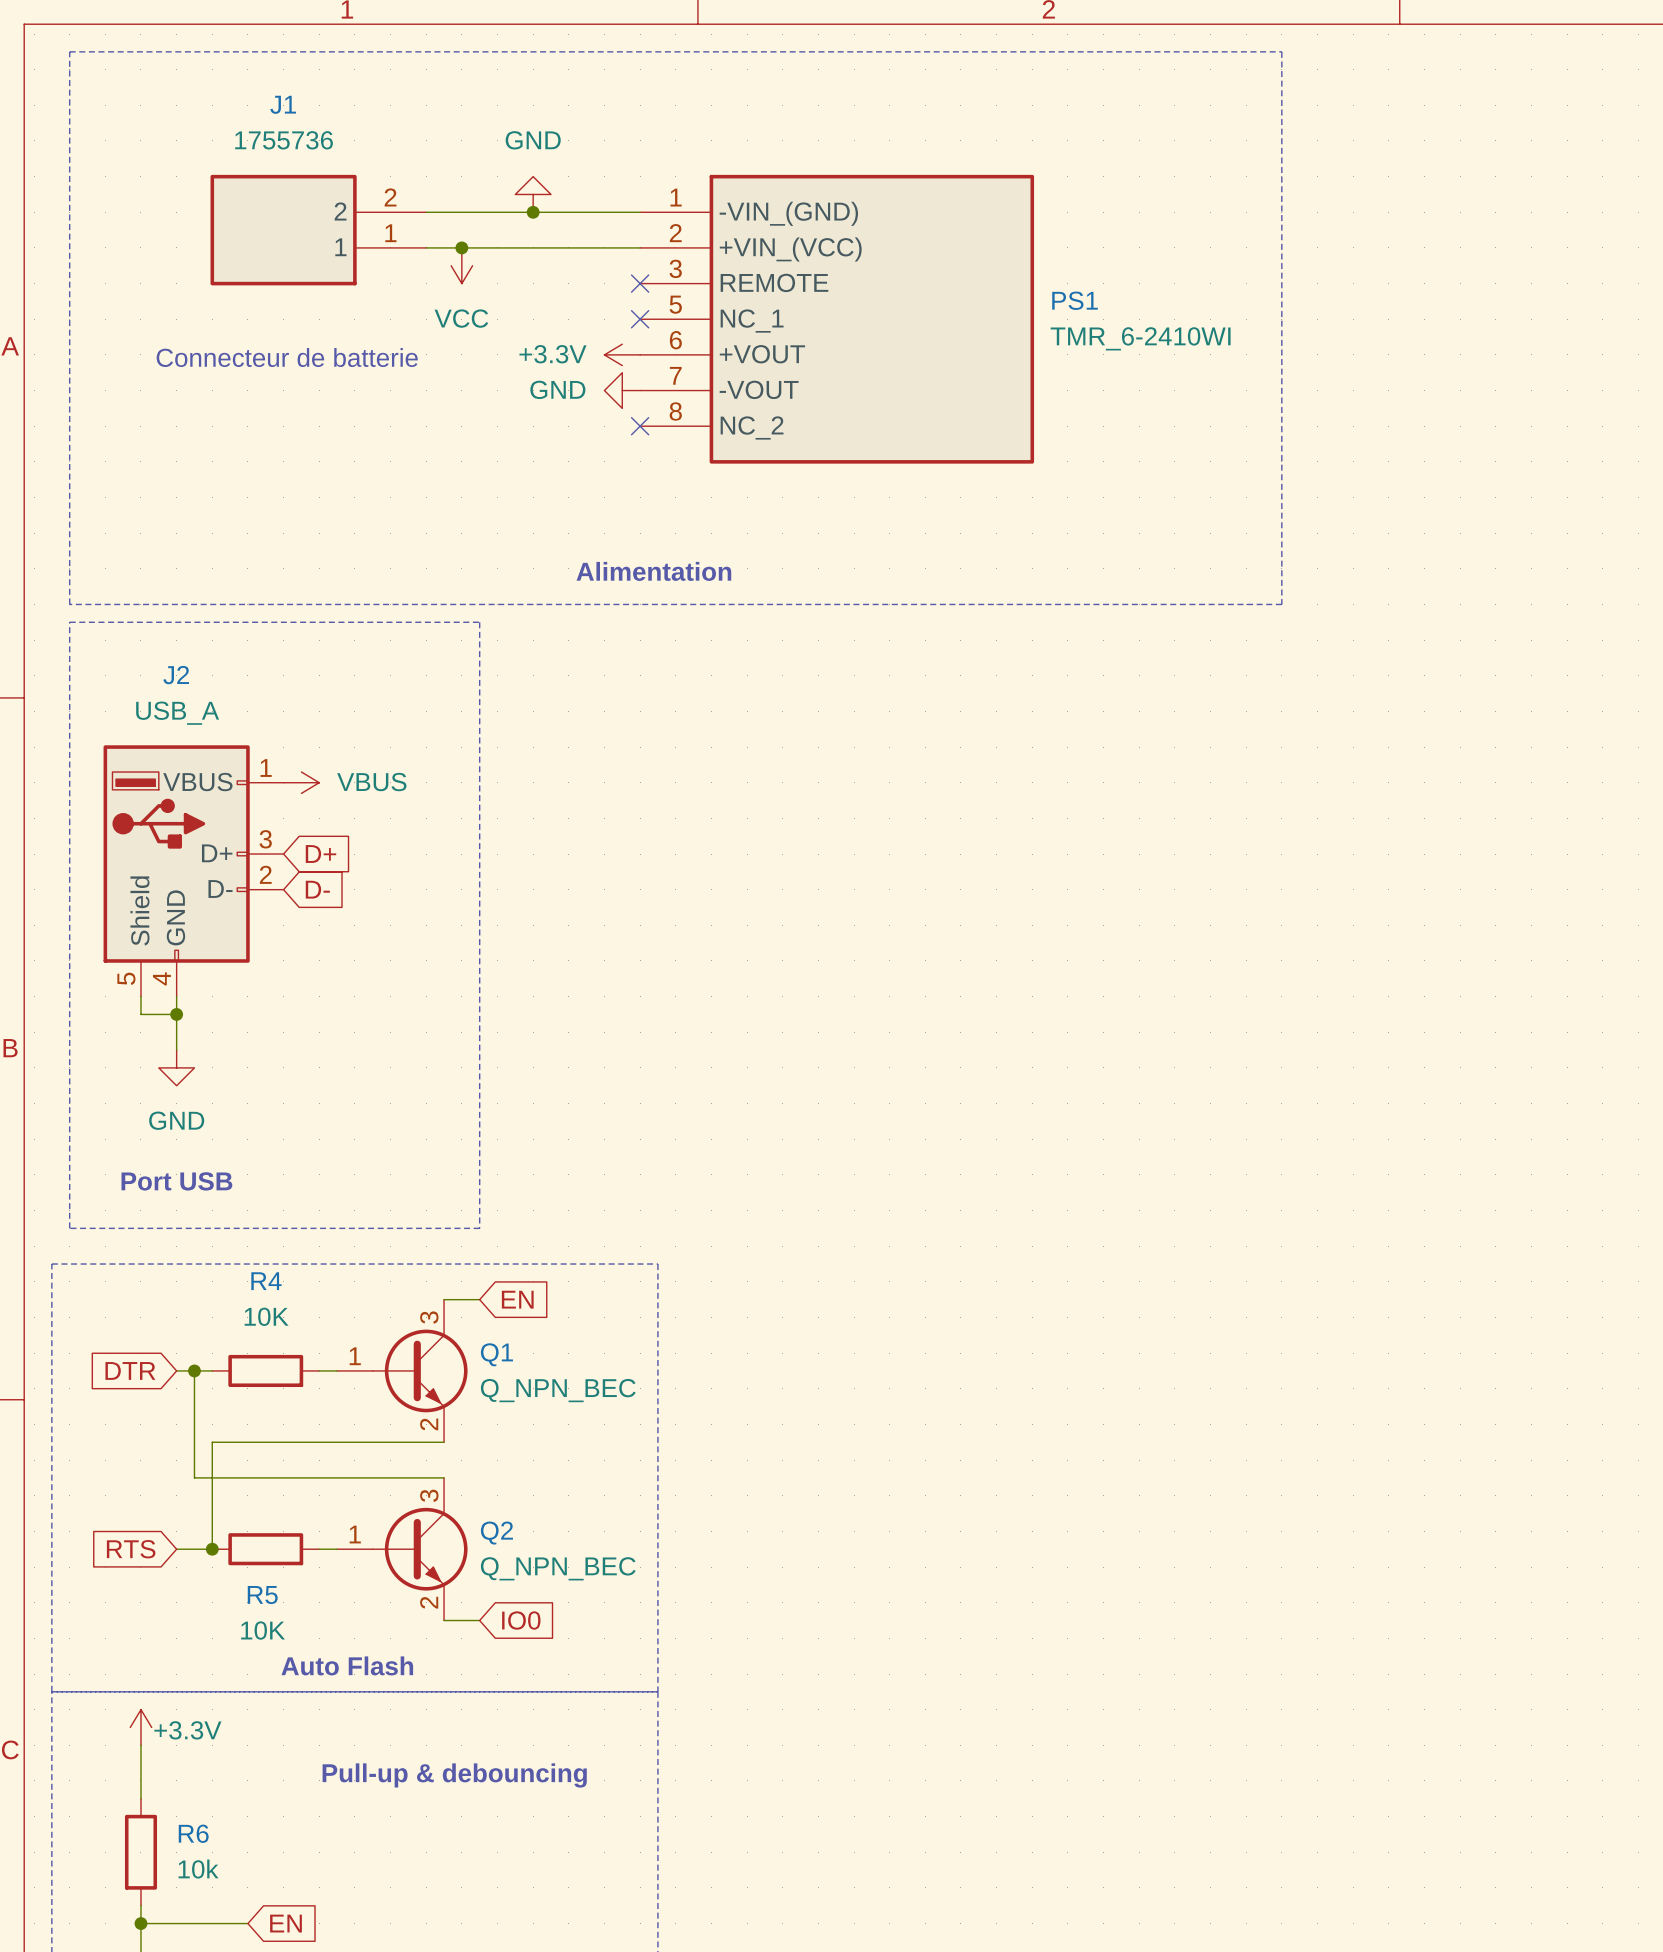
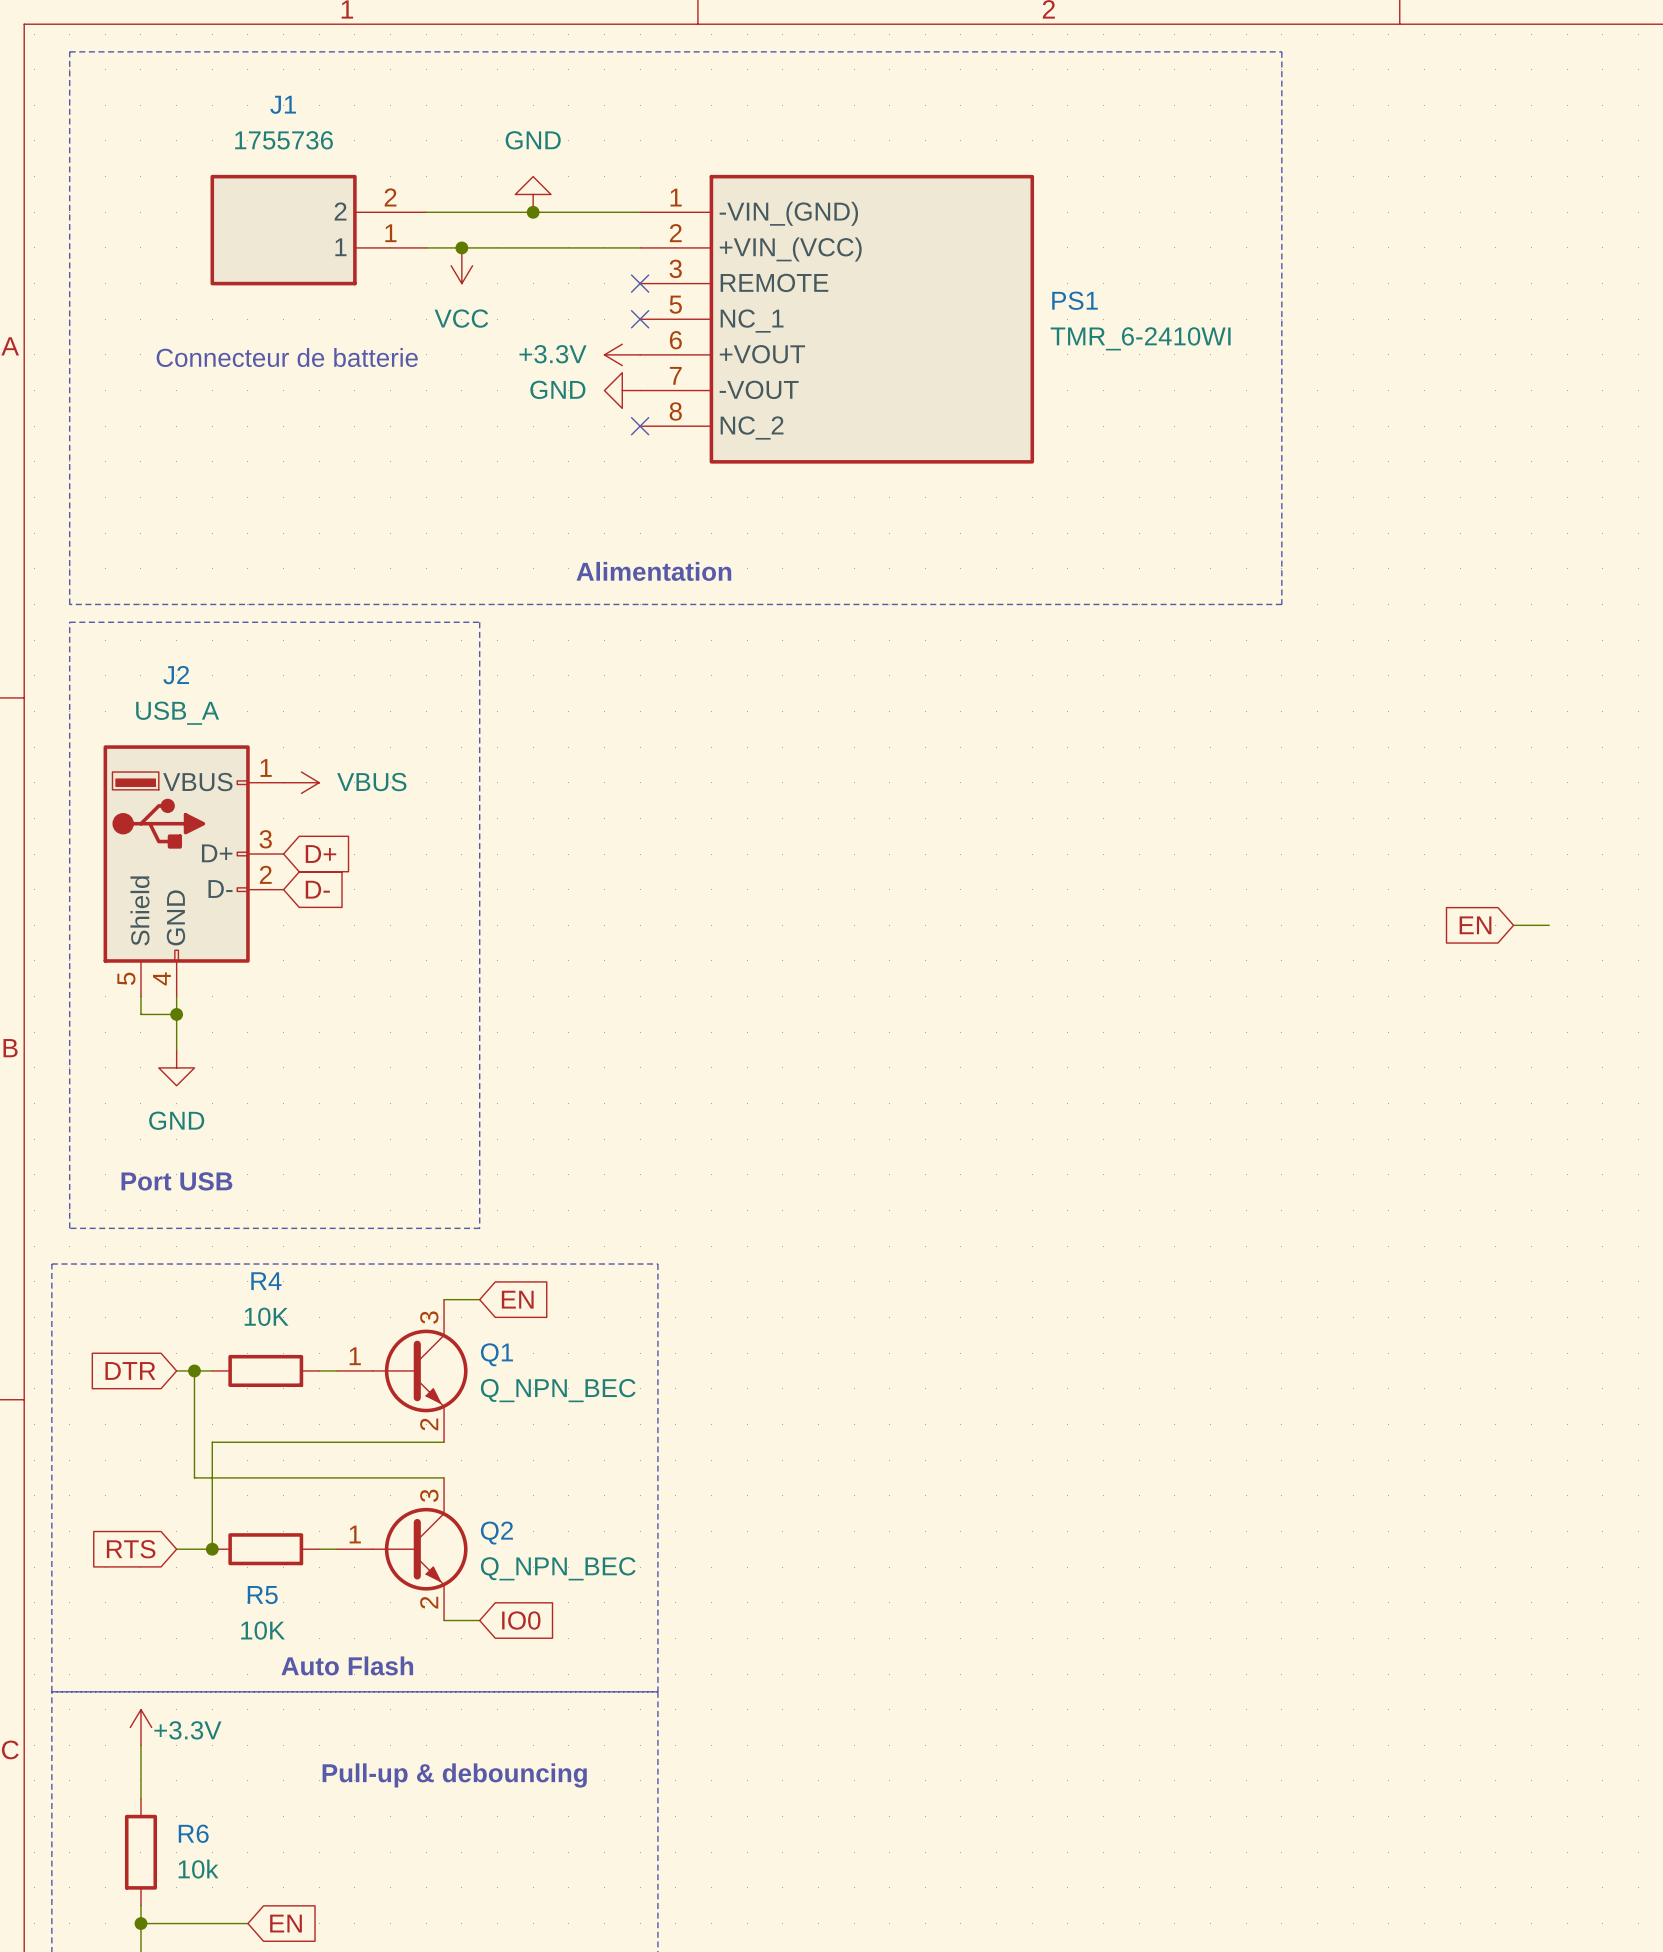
global label: none -> EN (1475, 925)
wire: none -> (1513, 925) (1549, 925)

